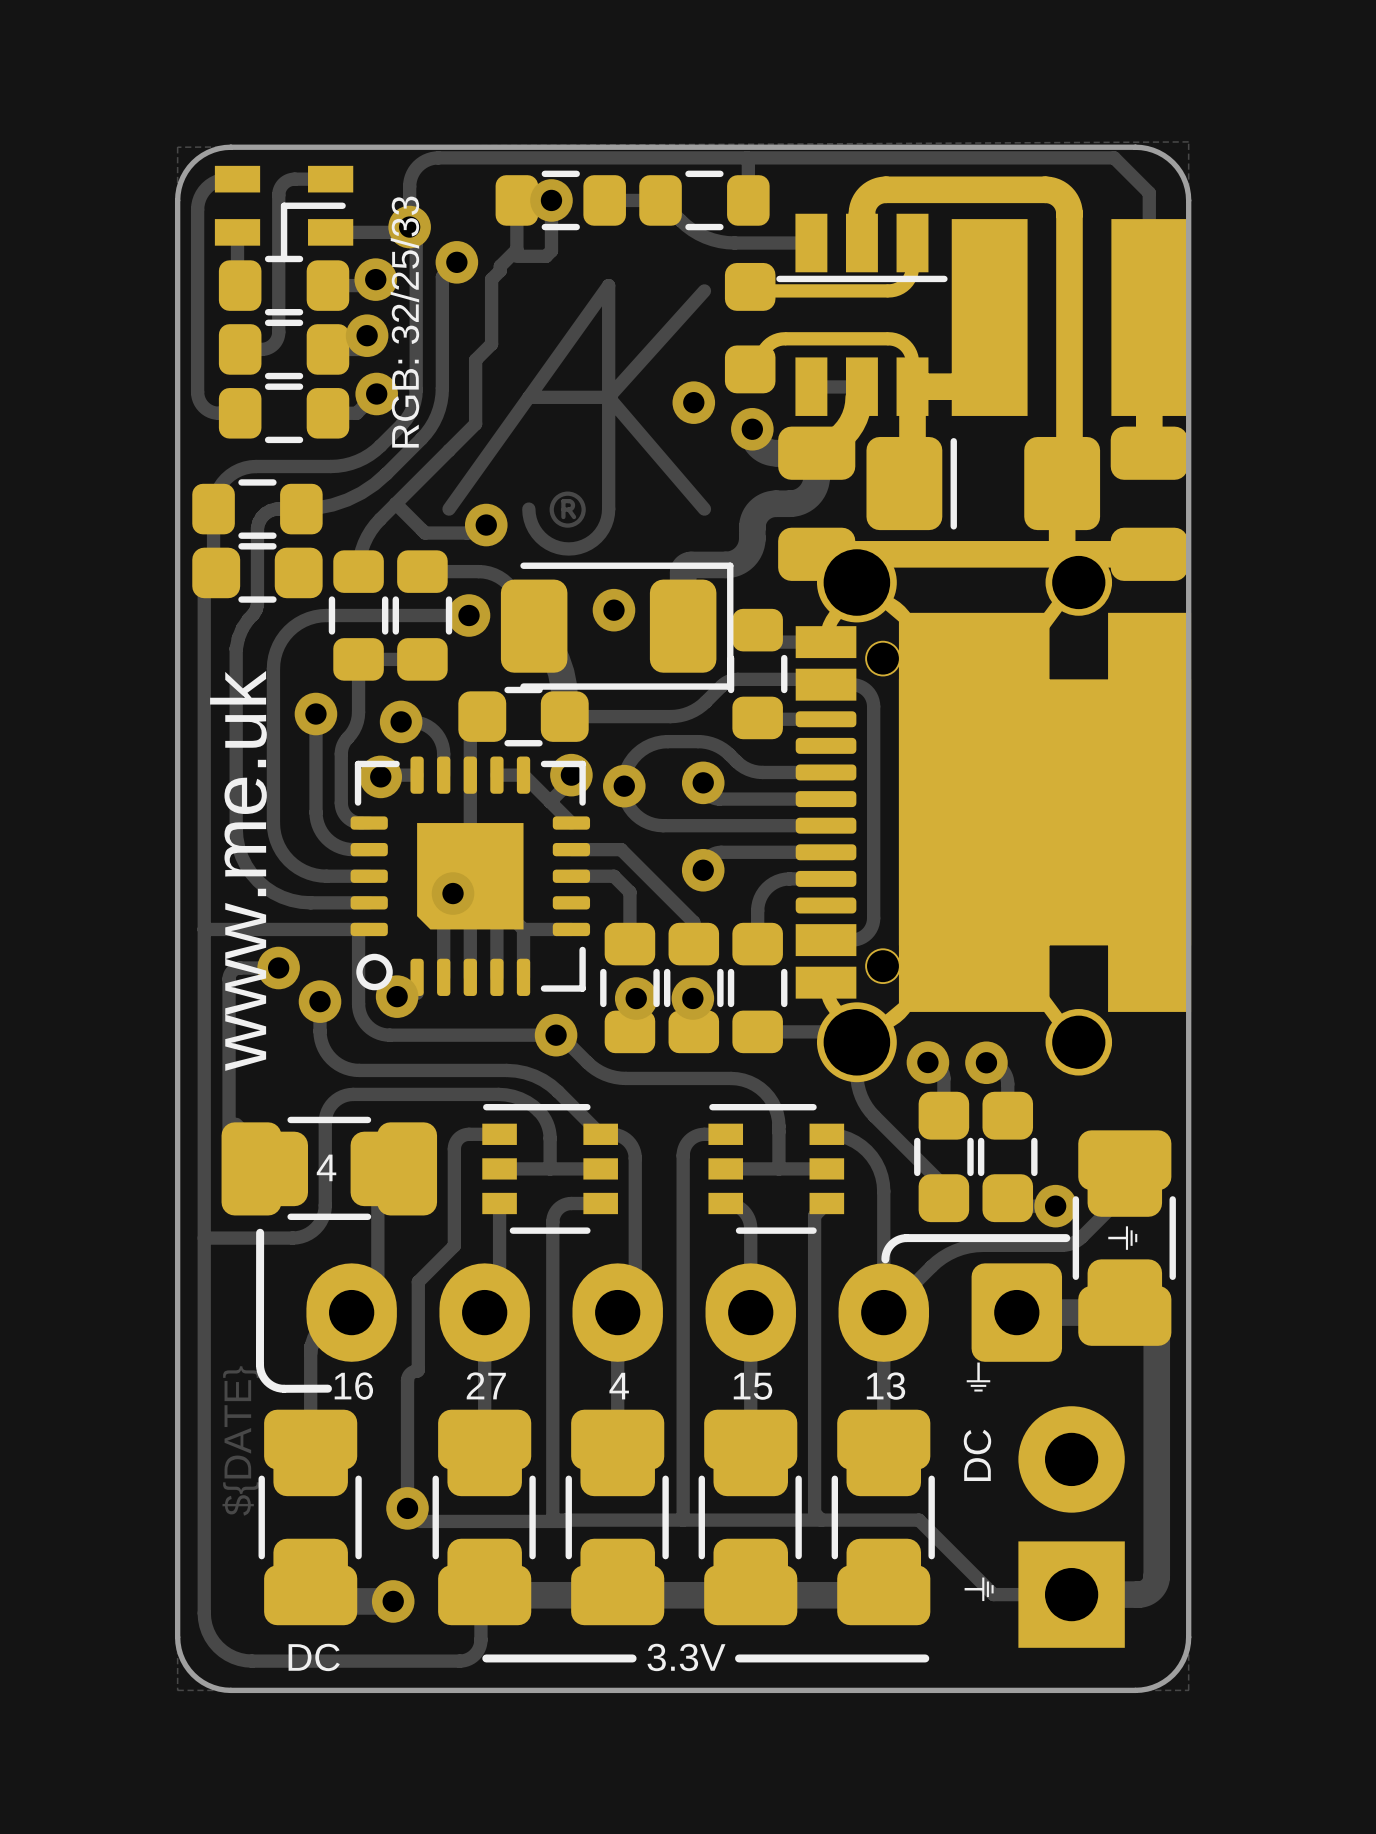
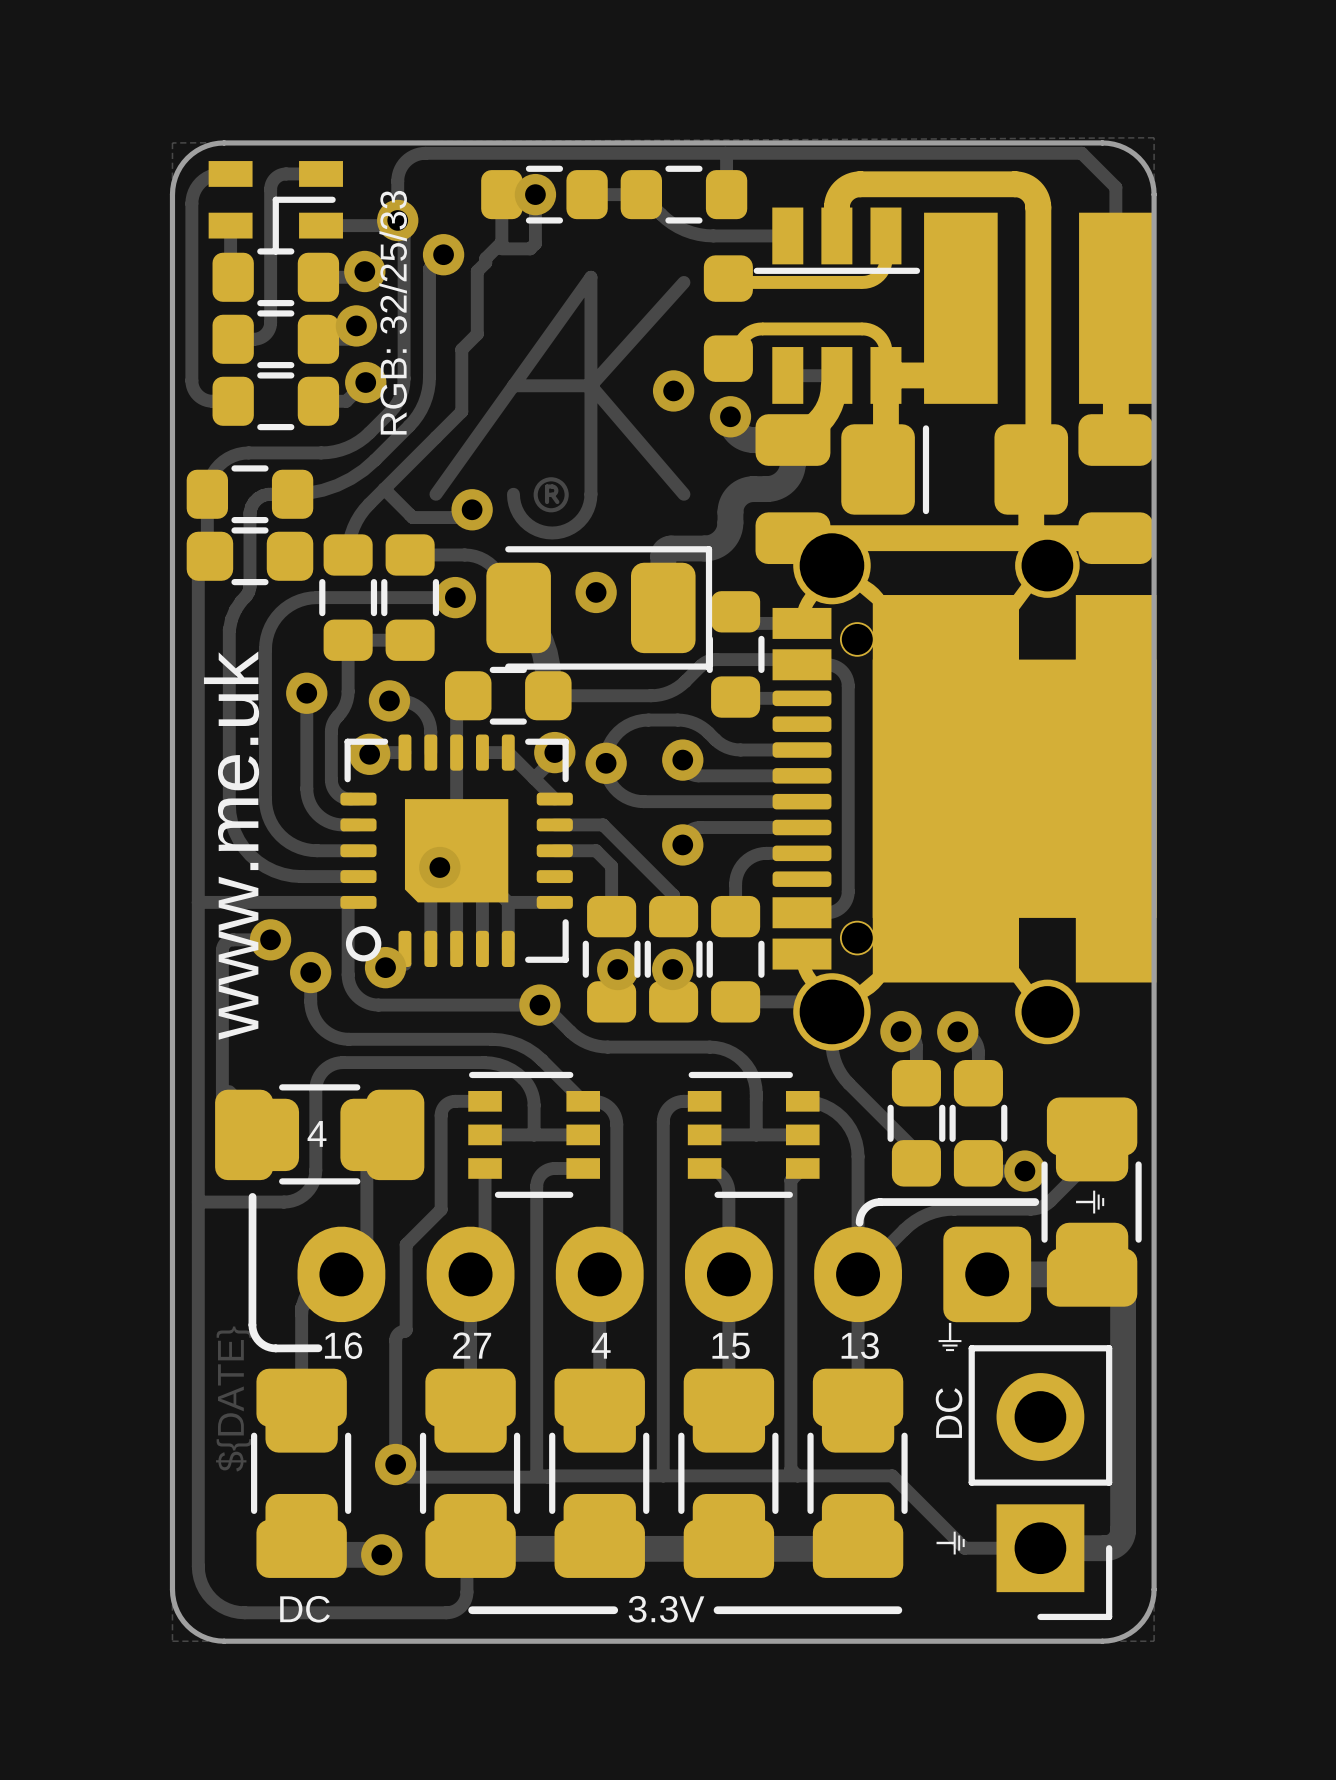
part footprint: [1018, 1406, 1125, 1648] -> [968, 1345, 1113, 1621]

